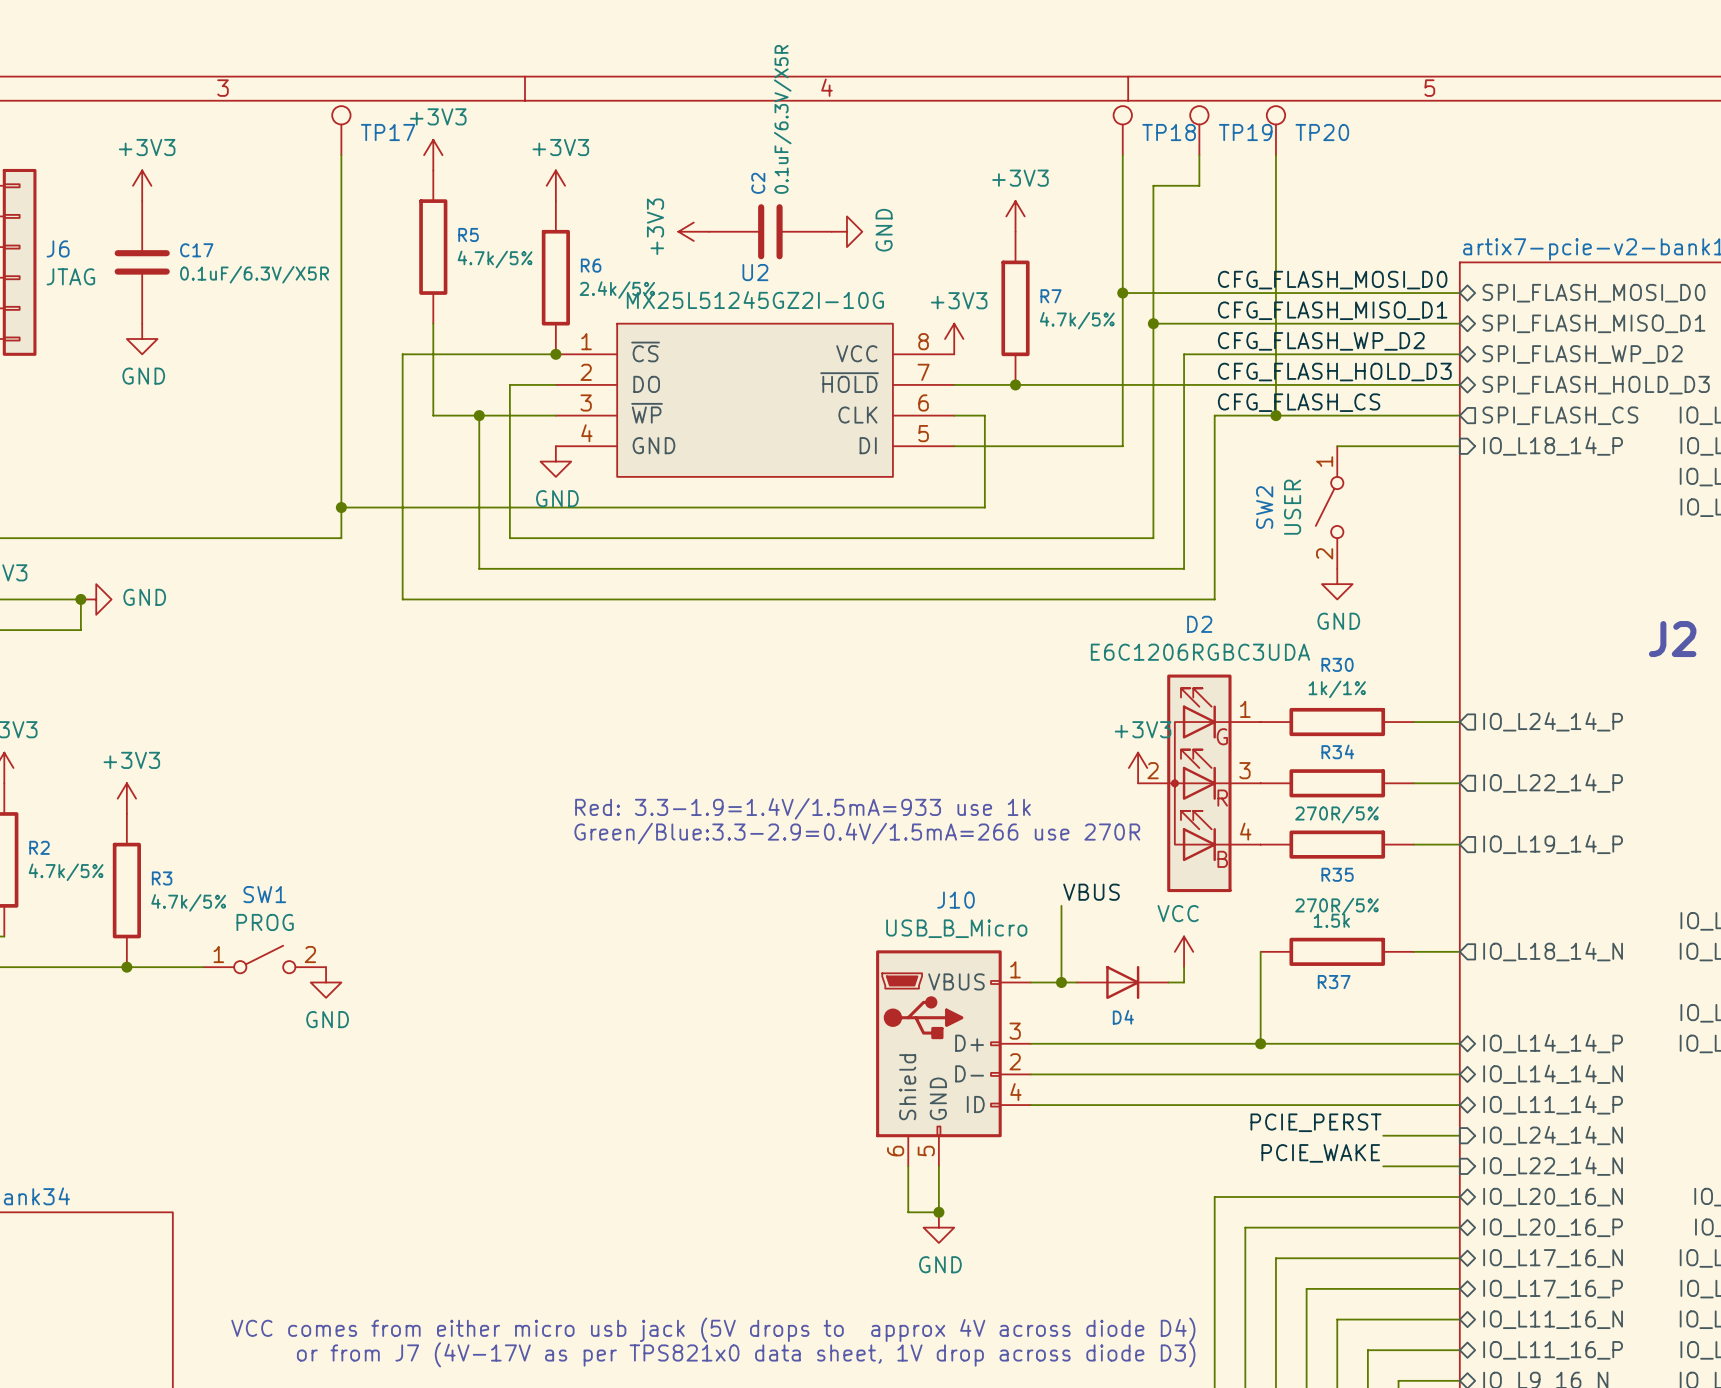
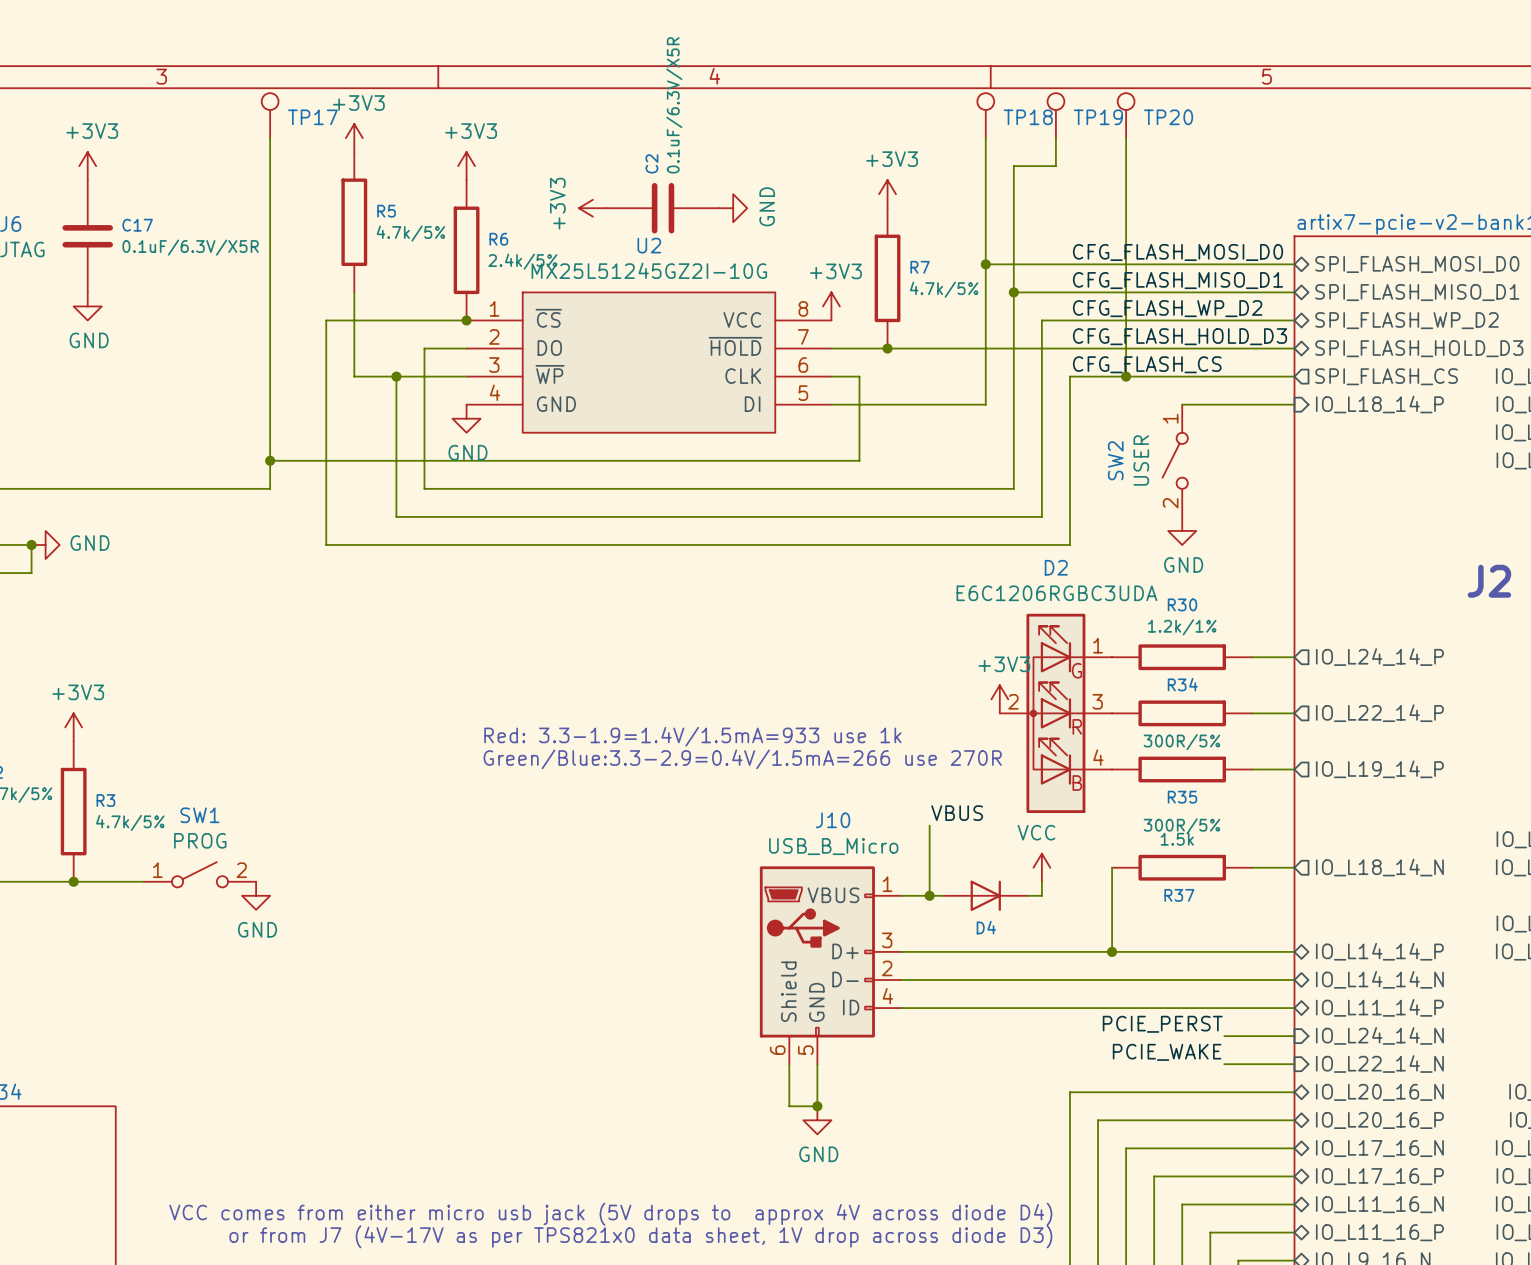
R30 value: 1k/1% (1337, 689) -> 1.2k/1% (1182, 627)
R34 value: 270R/5% (1336, 814) -> 300R/5% (1181, 742)
R35 value: 270R/5% (1336, 906) -> 300R/5% (1181, 826)

